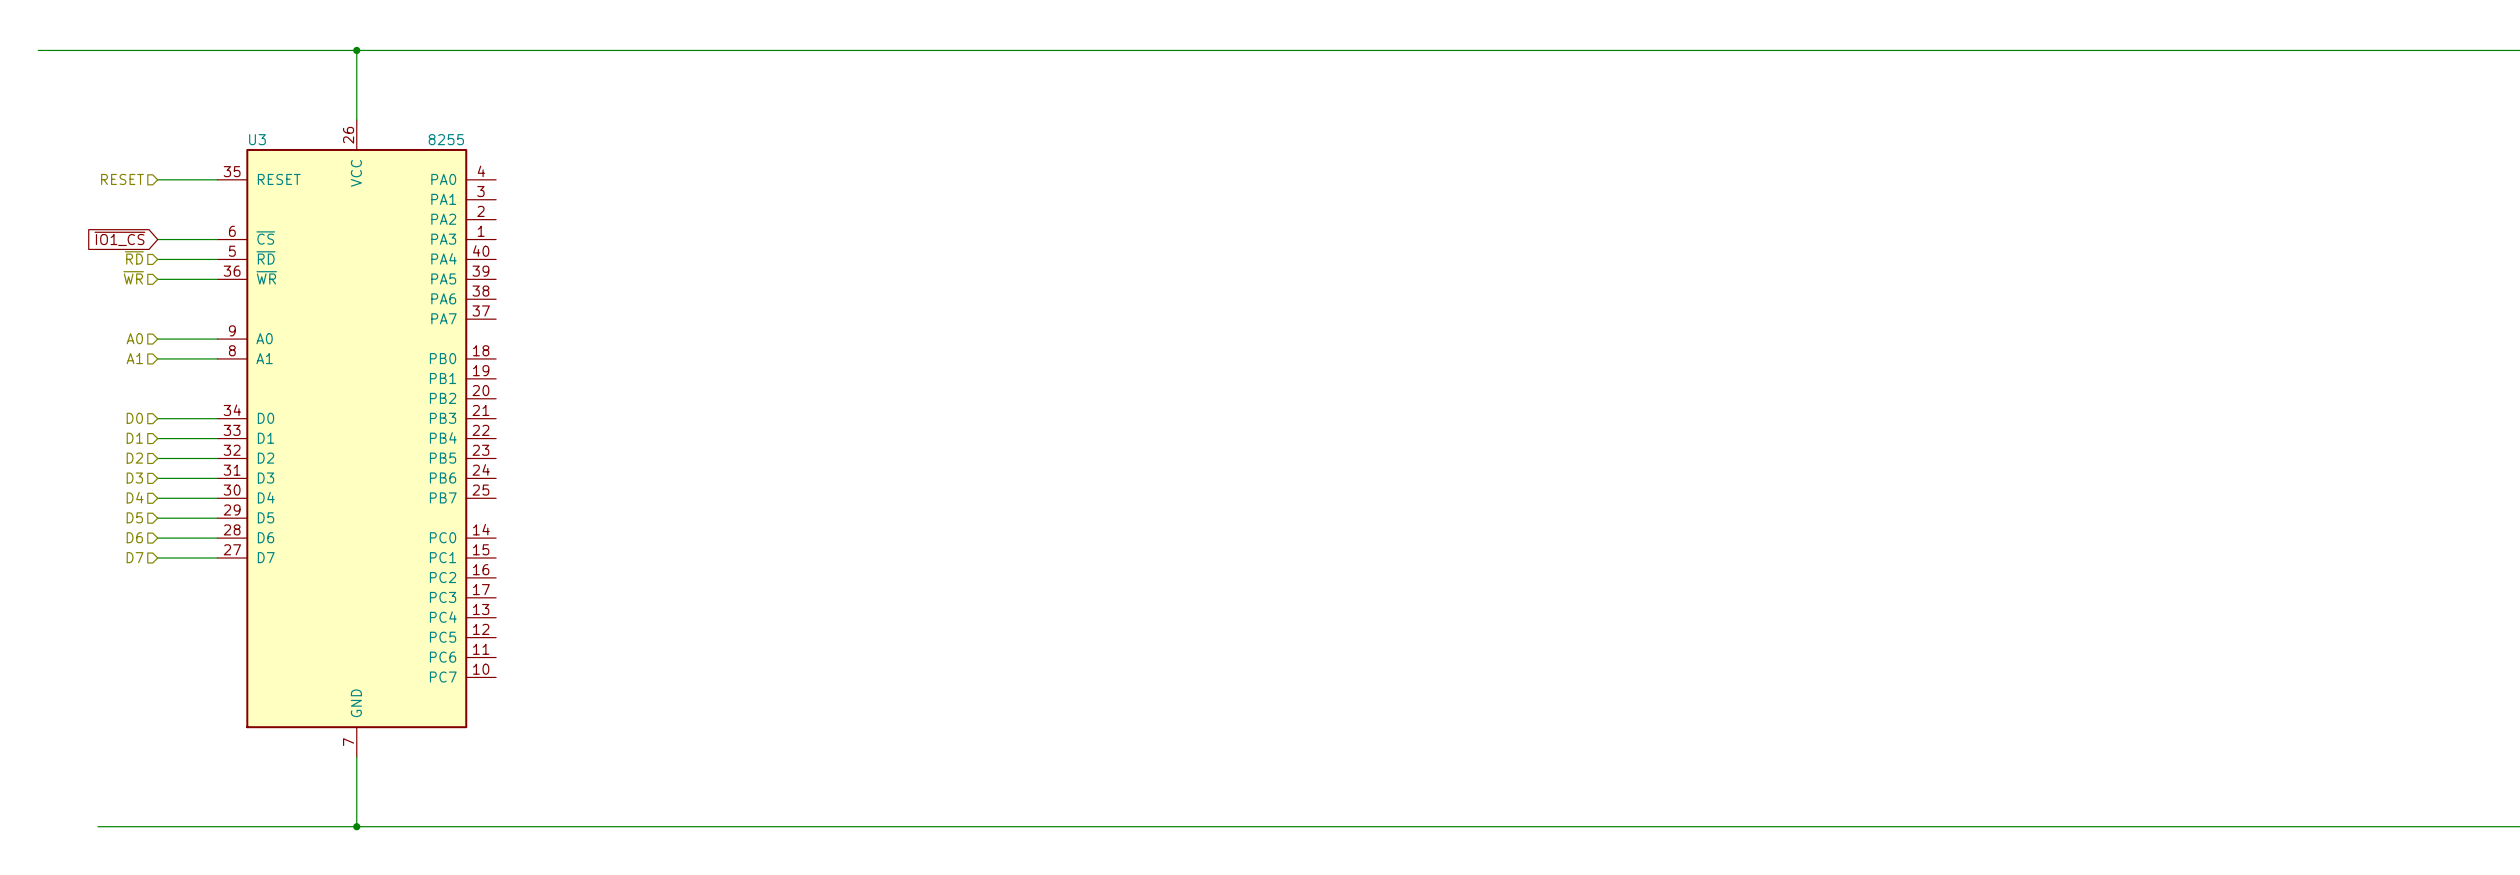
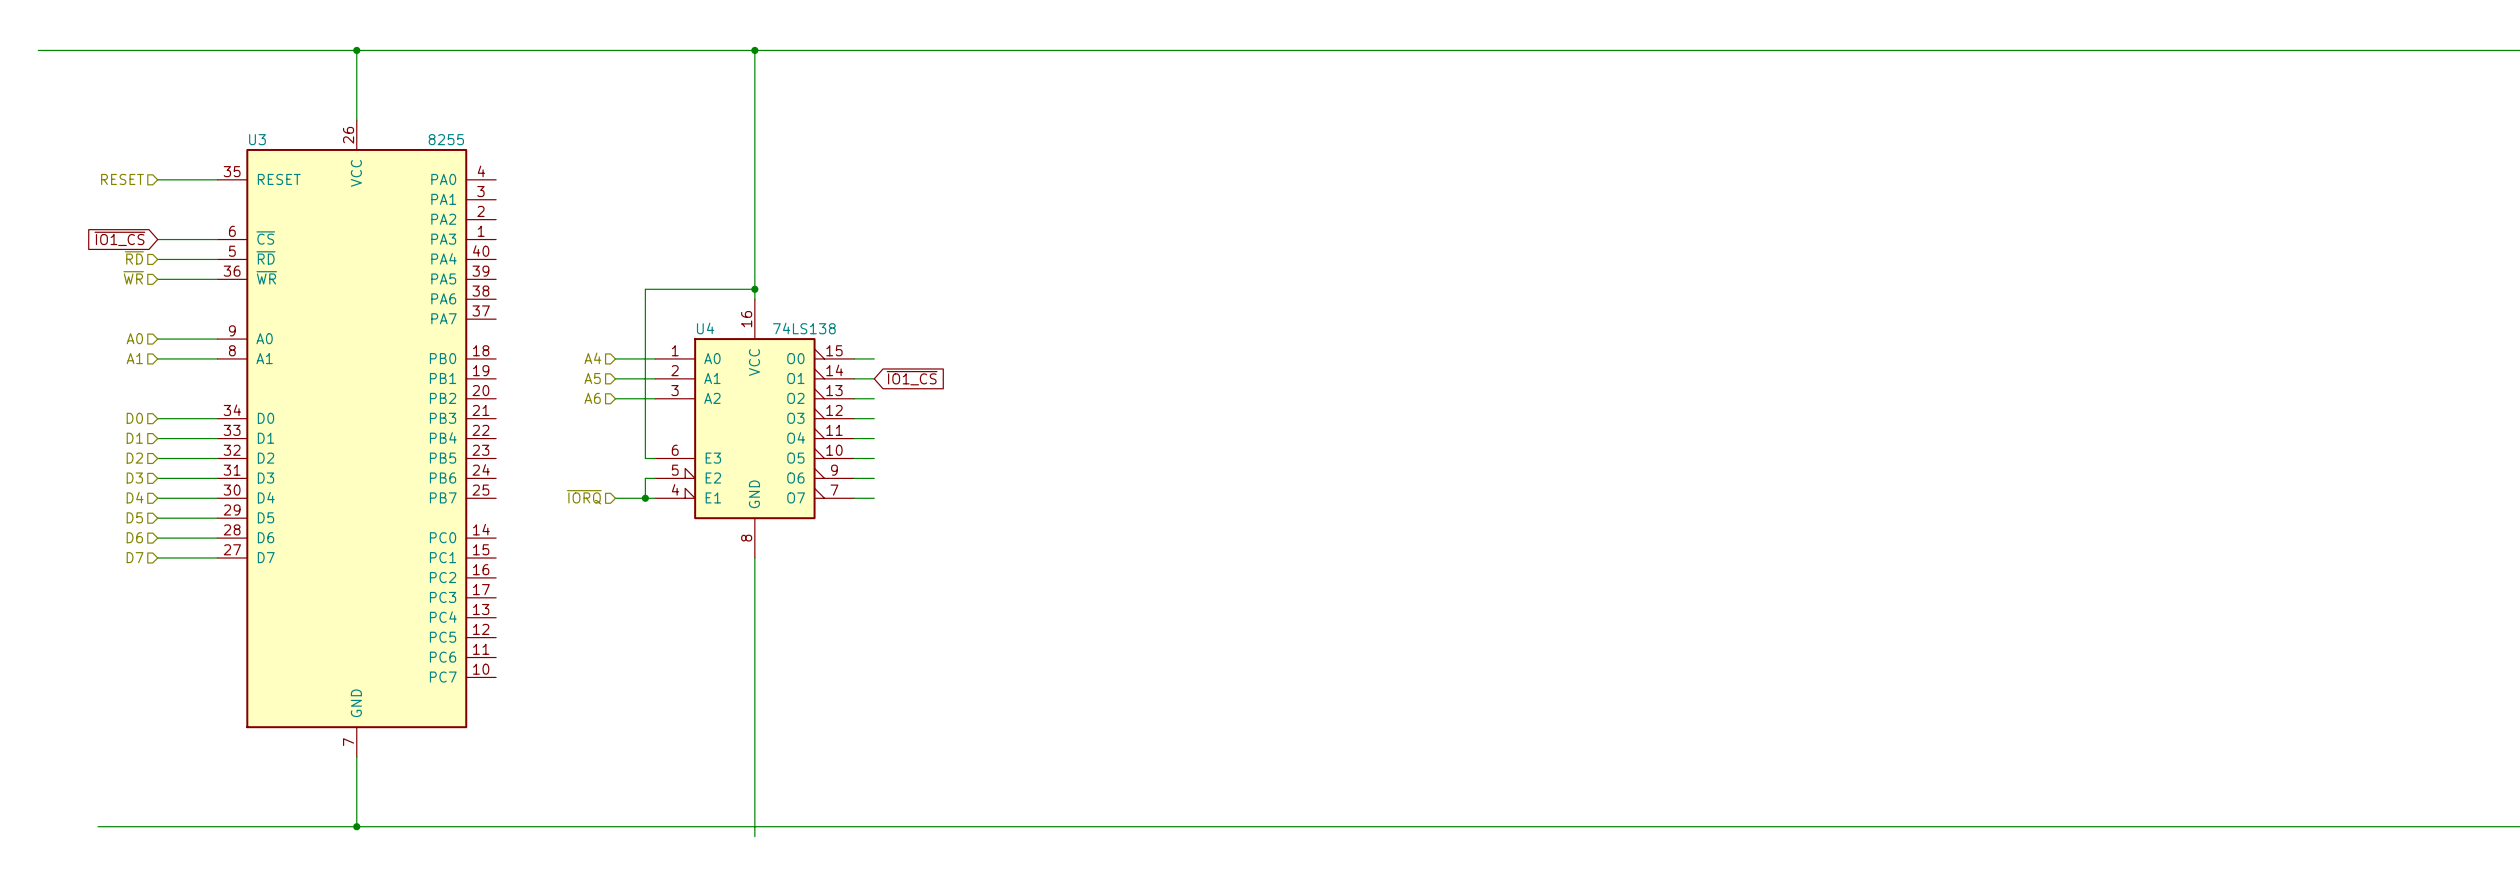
wire: none -> (754, 50) (754, 299)
junction: none -> (754, 50)
wire: none -> (754, 289) (645, 289) (645, 458) (655, 458)
junction: none -> (754, 289)
hierarchical label: none -> A4 (592, 358)
wire: none -> (615, 358) (655, 358)
wire: none -> (854, 358) (874, 358)
hierarchical label: none -> A5 (592, 378)
wire: none -> (615, 378) (655, 378)
wire: none -> (854, 378) (874, 378)
global label: none -> ~{IO1_CS} (912, 378)
hierarchical label: none -> A6 (592, 398)
wire: none -> (615, 398) (655, 398)
wire: none -> (854, 398) (874, 398)
wire: none -> (854, 418) (874, 418)
U4: none -> 74LS138 (754, 428)
wire: none -> (854, 438) (874, 438)
wire: none -> (854, 458) (874, 458)
wire: none -> (655, 478) (645, 478) (645, 498)
wire: none -> (854, 478) (874, 478)
hierarchical label: none -> ~{IORQ} (584, 497)
wire: none -> (615, 498) (655, 498)
junction: none -> (645, 498)
wire: none -> (854, 498) (874, 498)
wire: none -> (754, 558) (754, 836)

